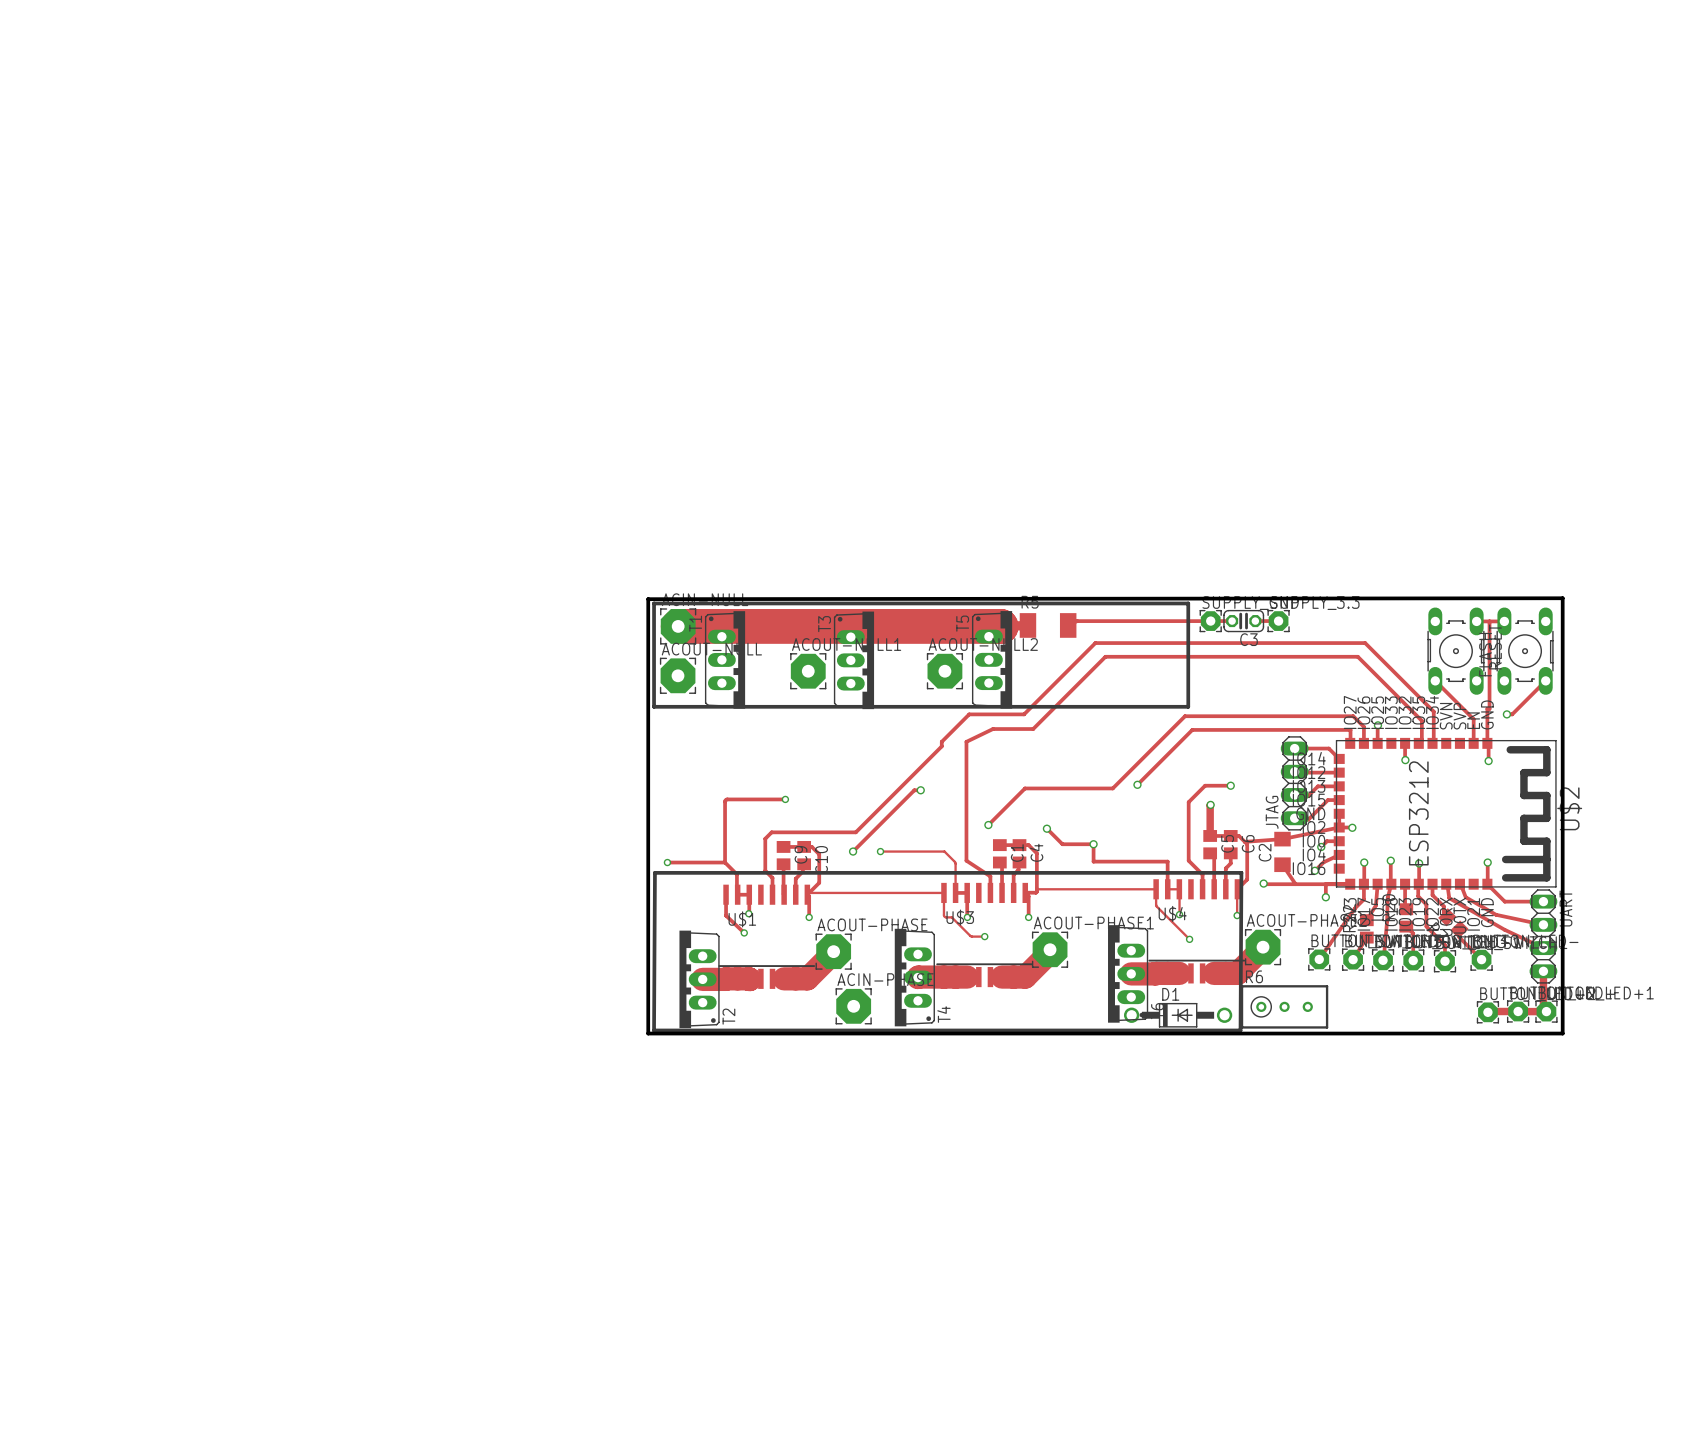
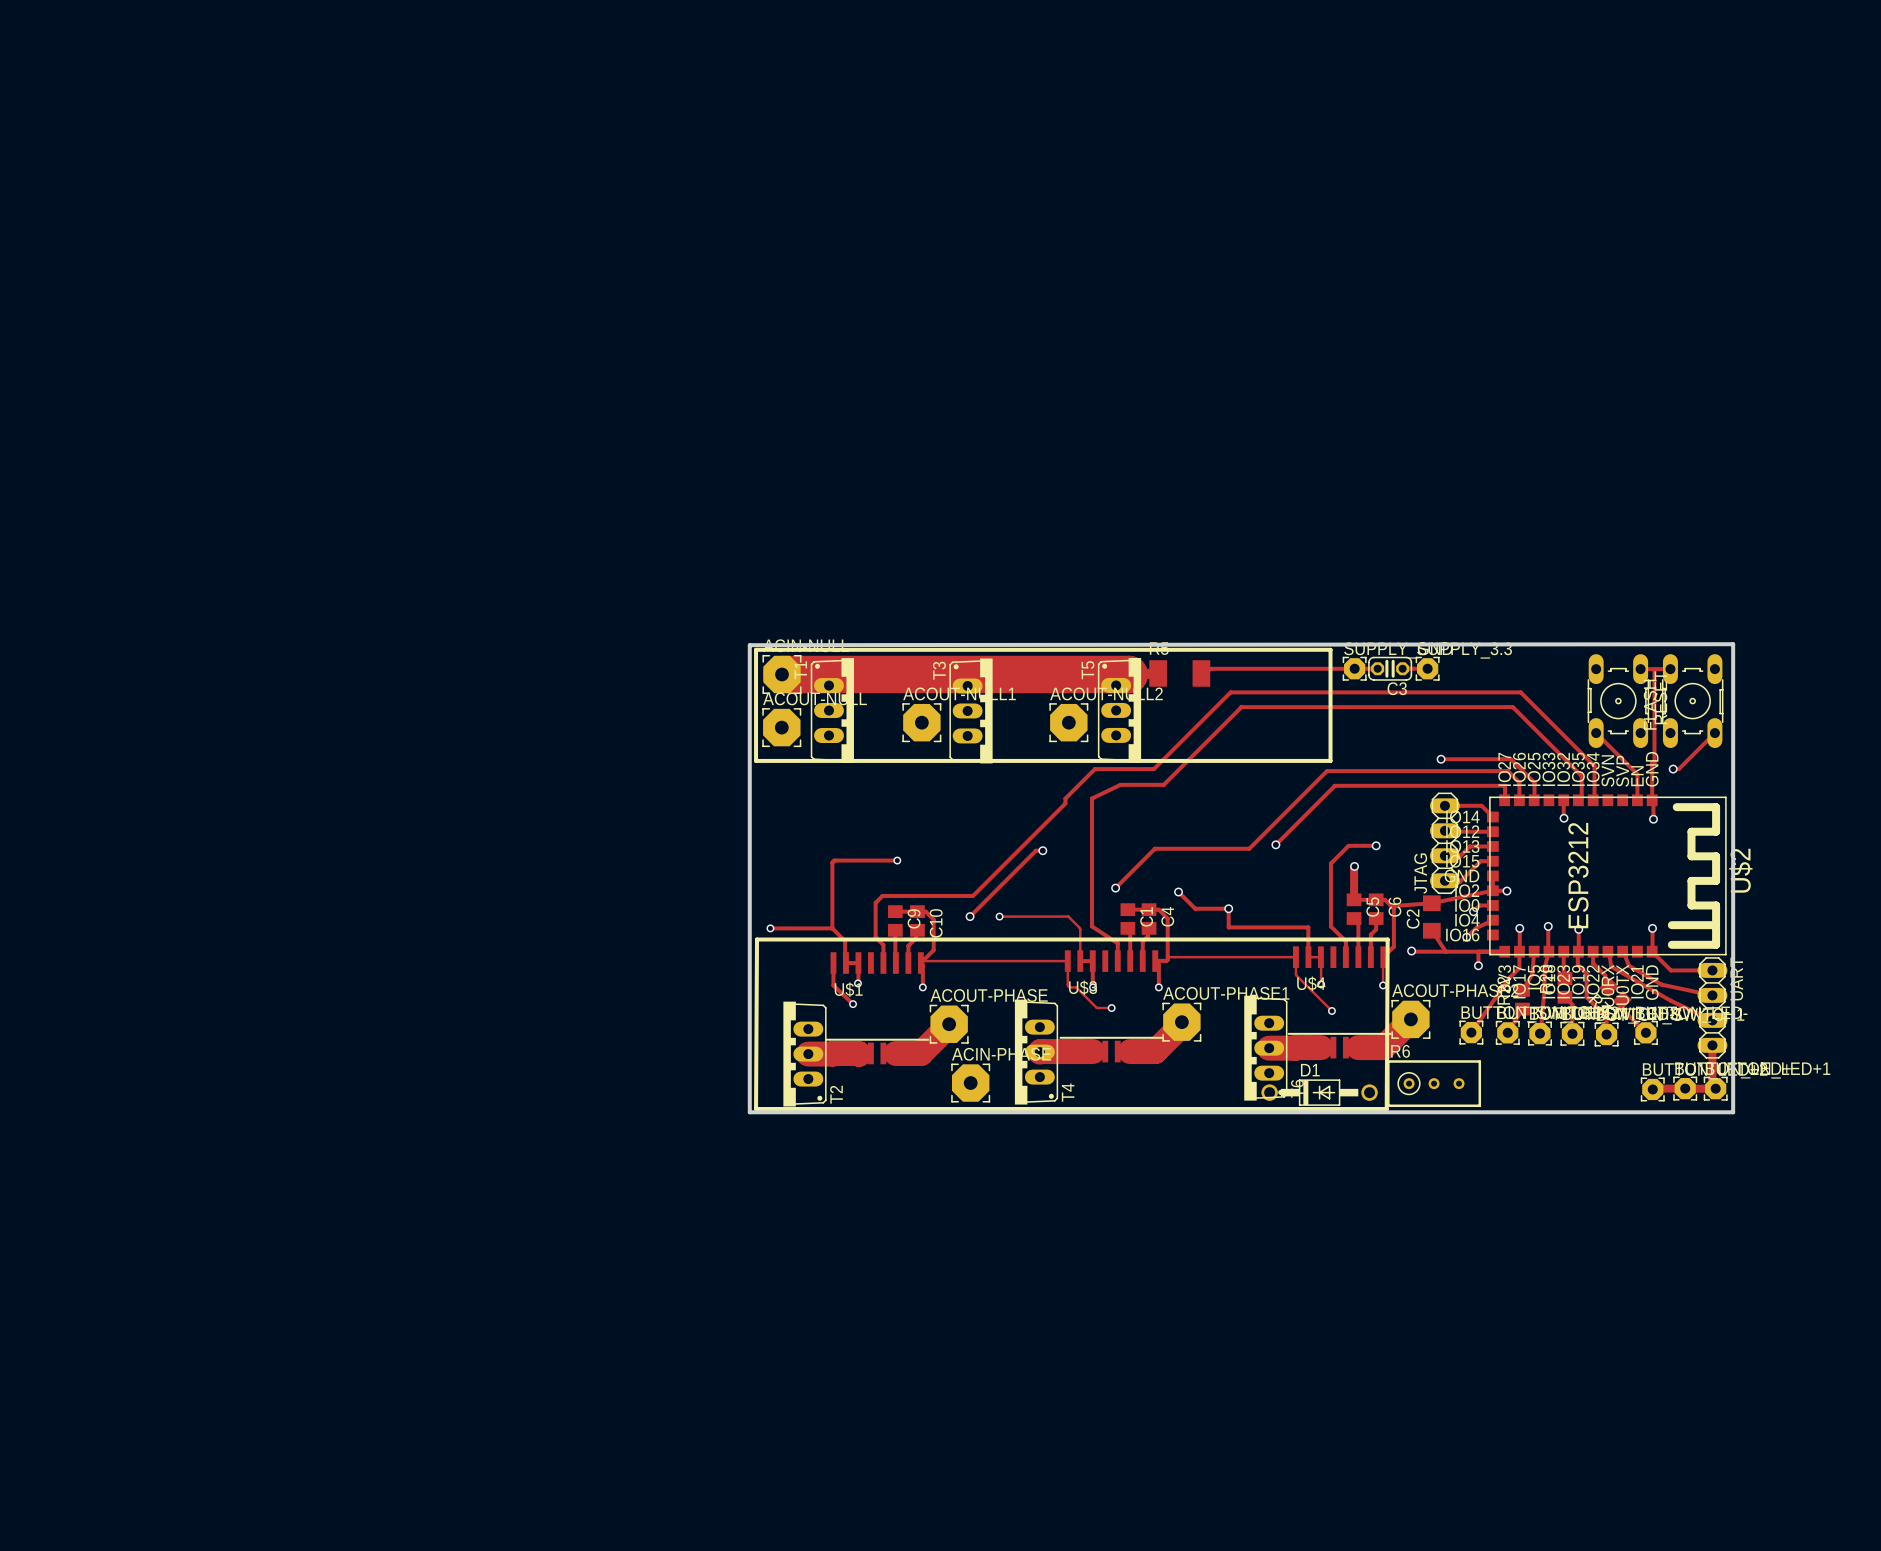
via: none -> (1441, 759)
track: (1377, 725) (1377, 743) -> (1441, 759) (1510, 759) (1534, 782) (1534, 800)
via: (1377, 725) -> none

